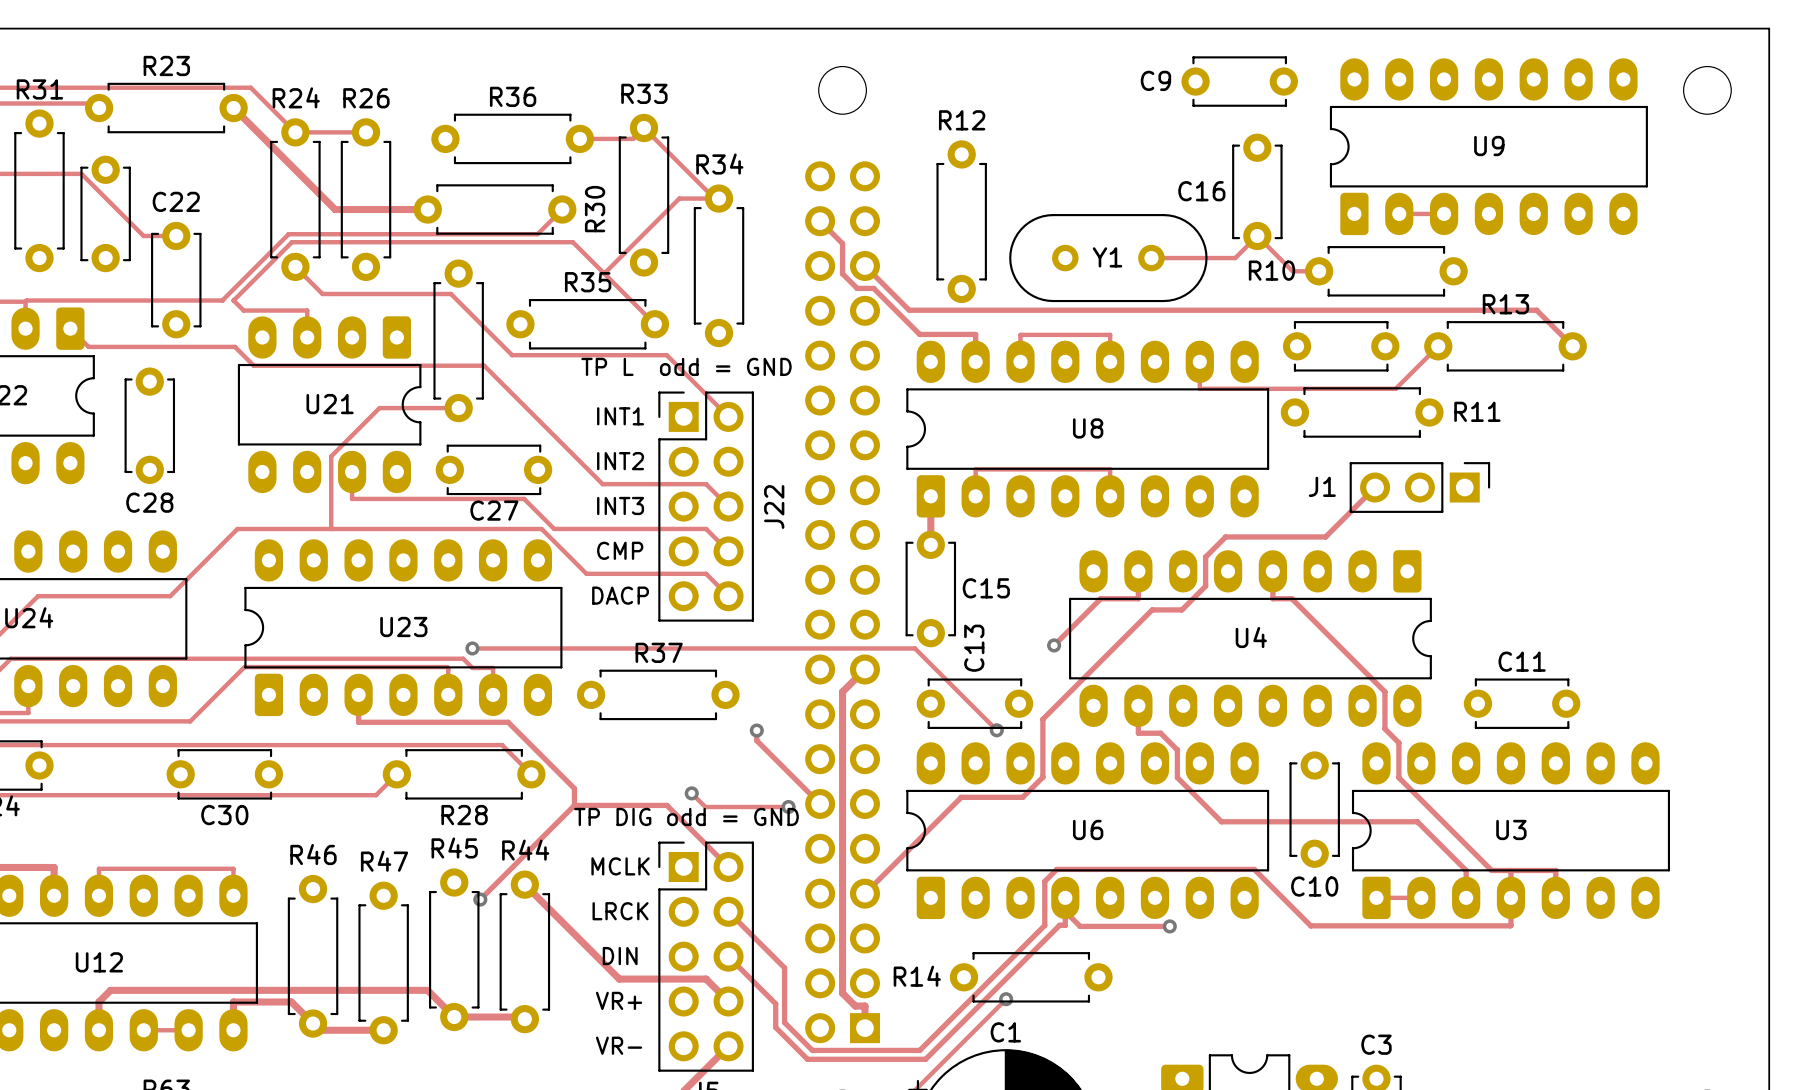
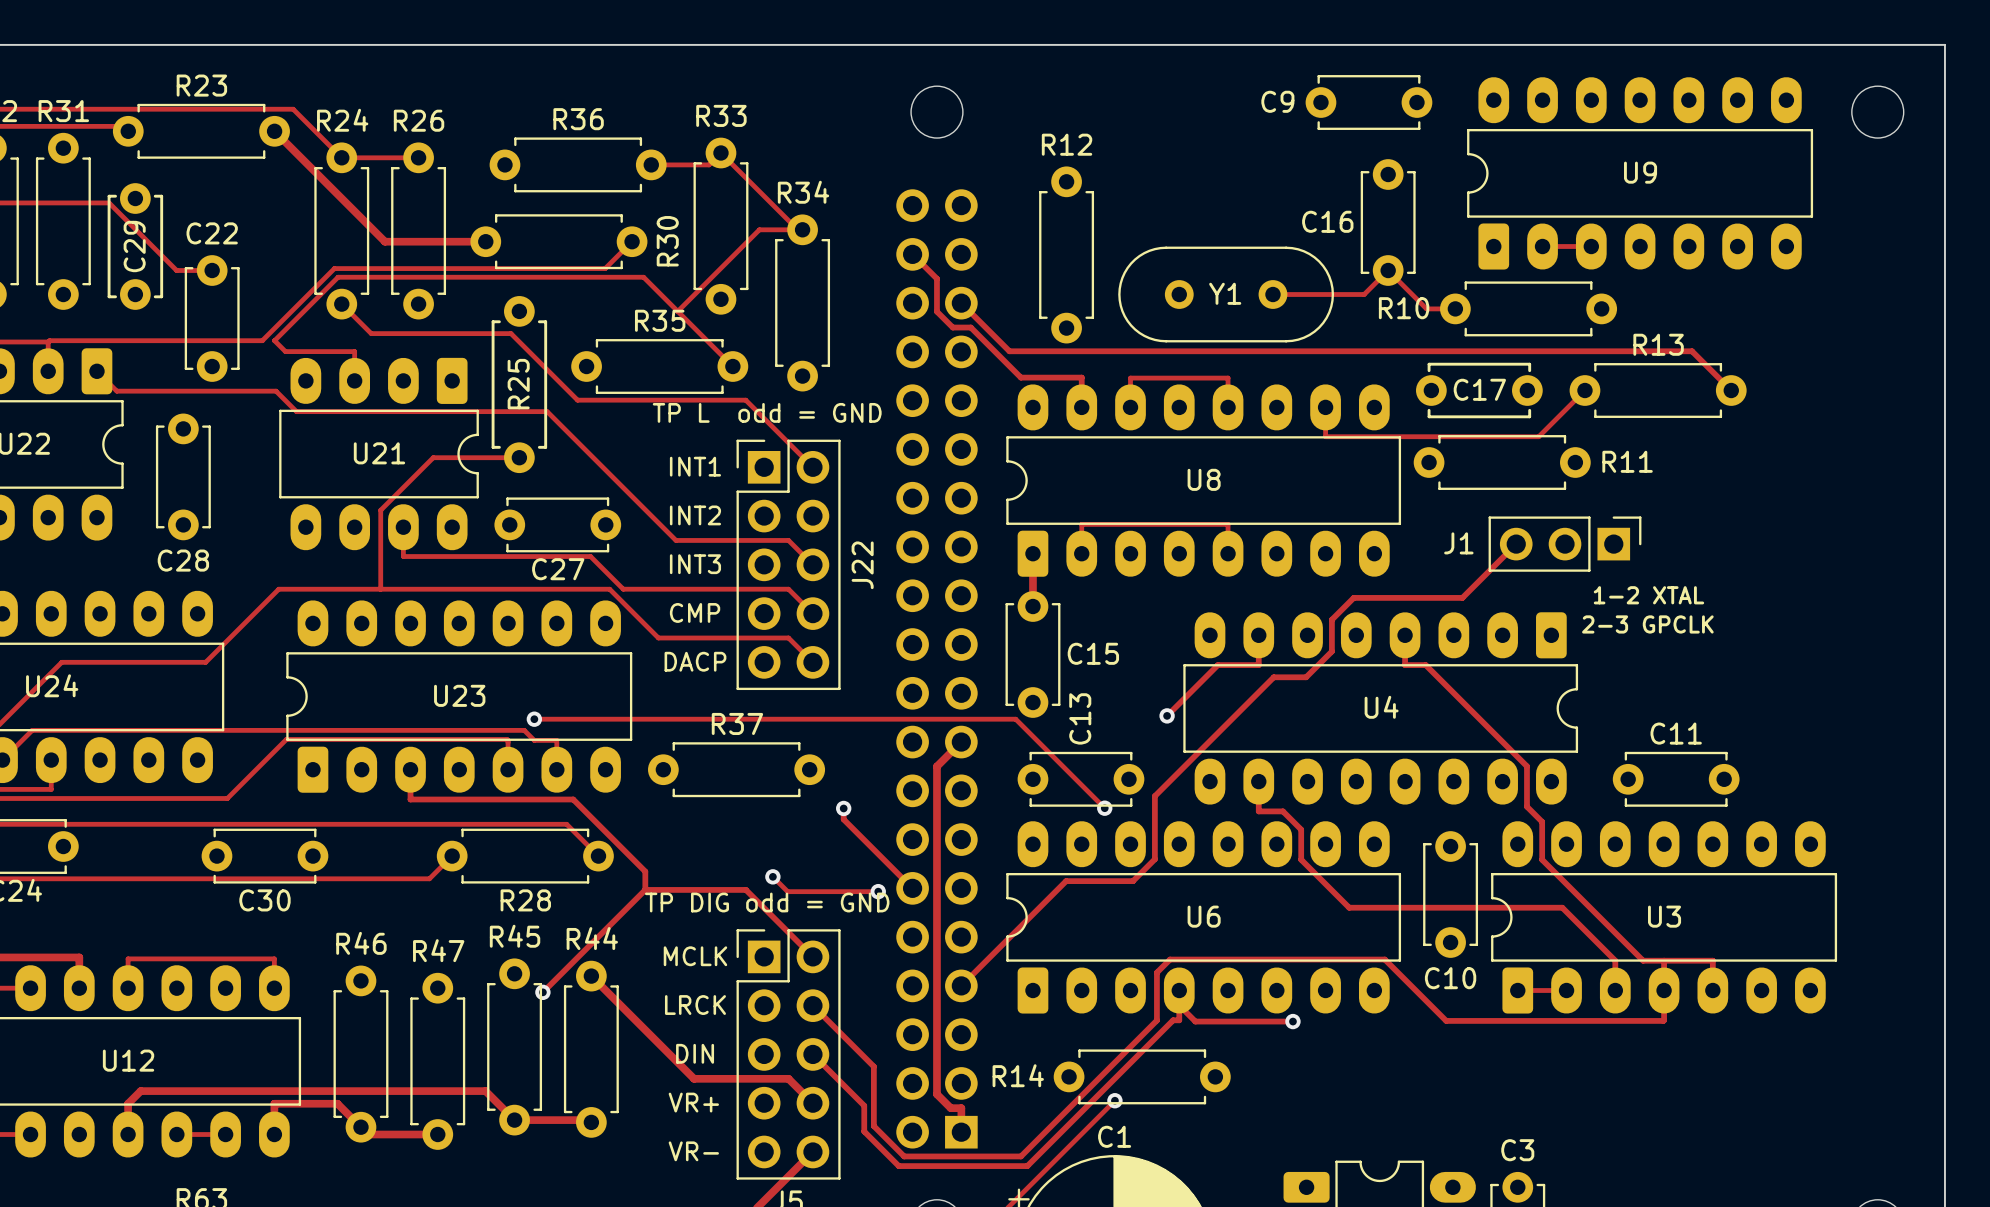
part: (105, 213) -> none
C29: none -> (135, 246)
part: (458, 340) -> none
R25: none -> (519, 384)
part: (1341, 346) -> none
C17: none -> (1479, 390)
text: none -> 1-2 XTAL (1648, 595)
text: none -> 2-3 GPCLK (1647, 624)

